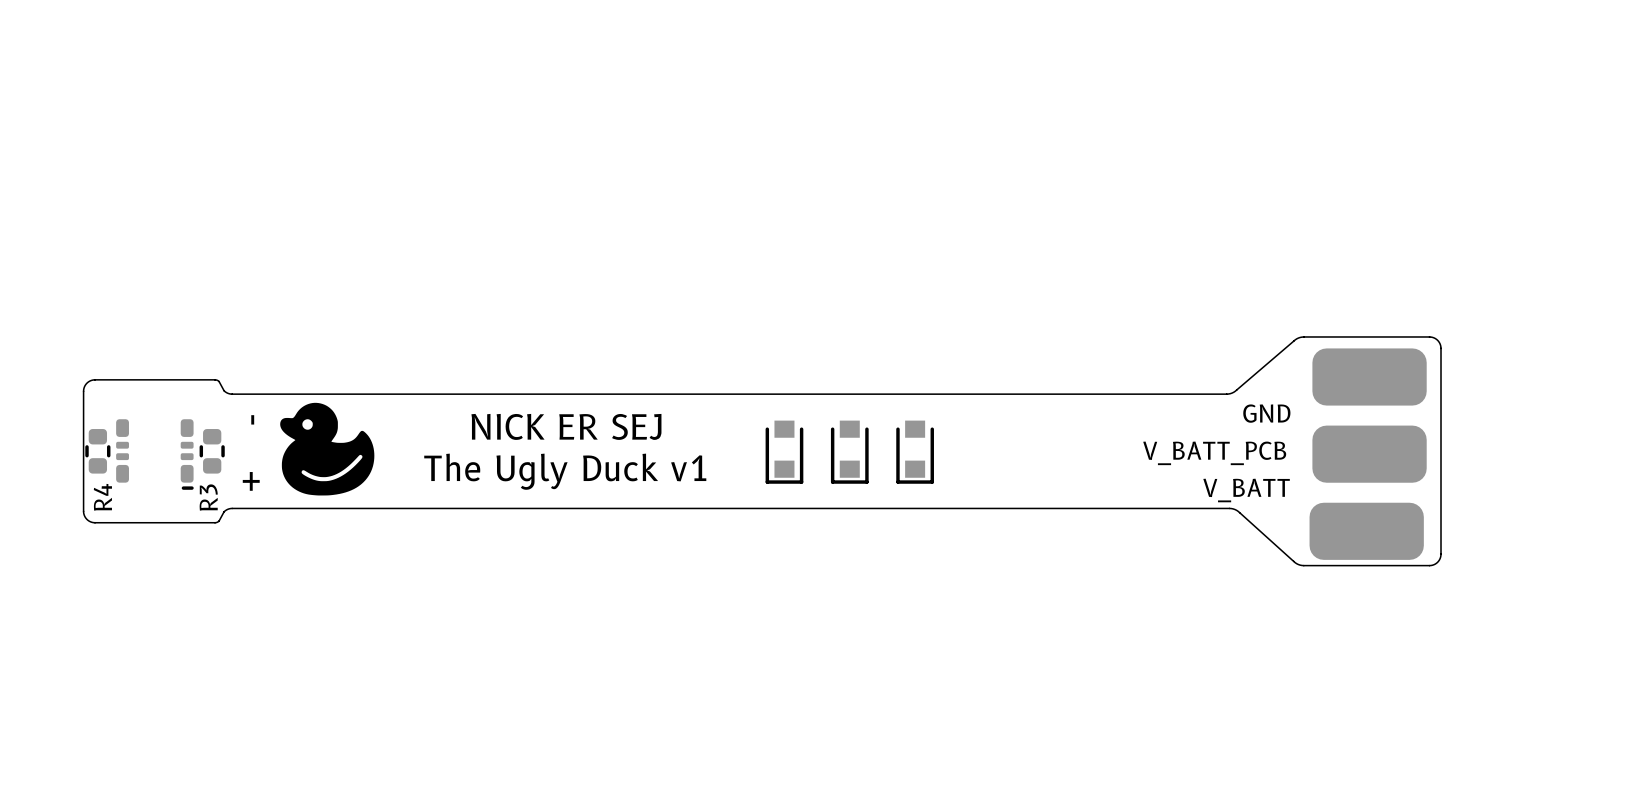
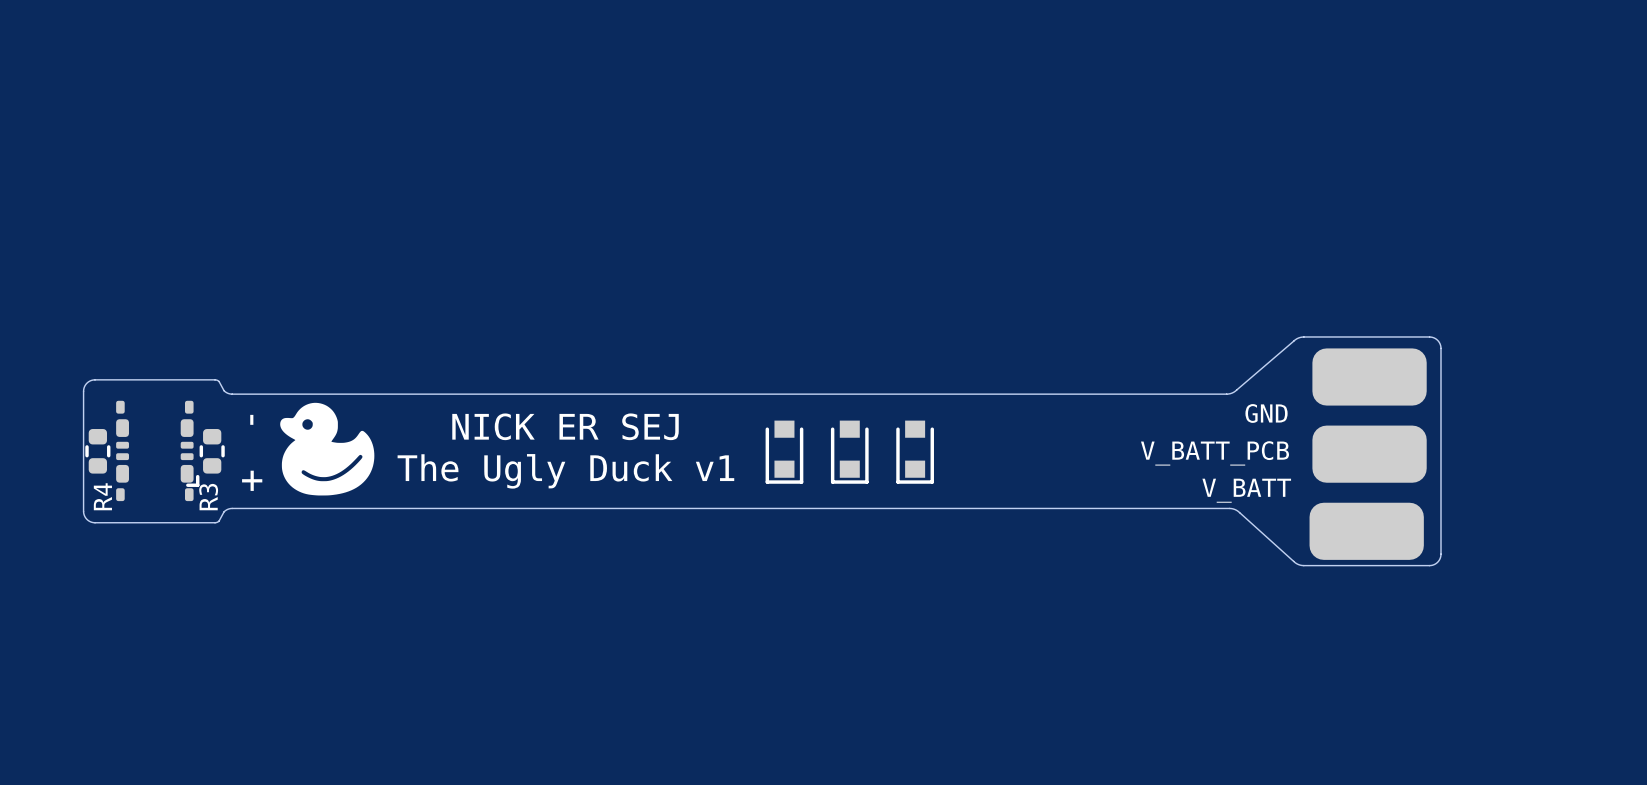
part footprint: [116, 419, 194, 490] -> [116, 400, 200, 502]

